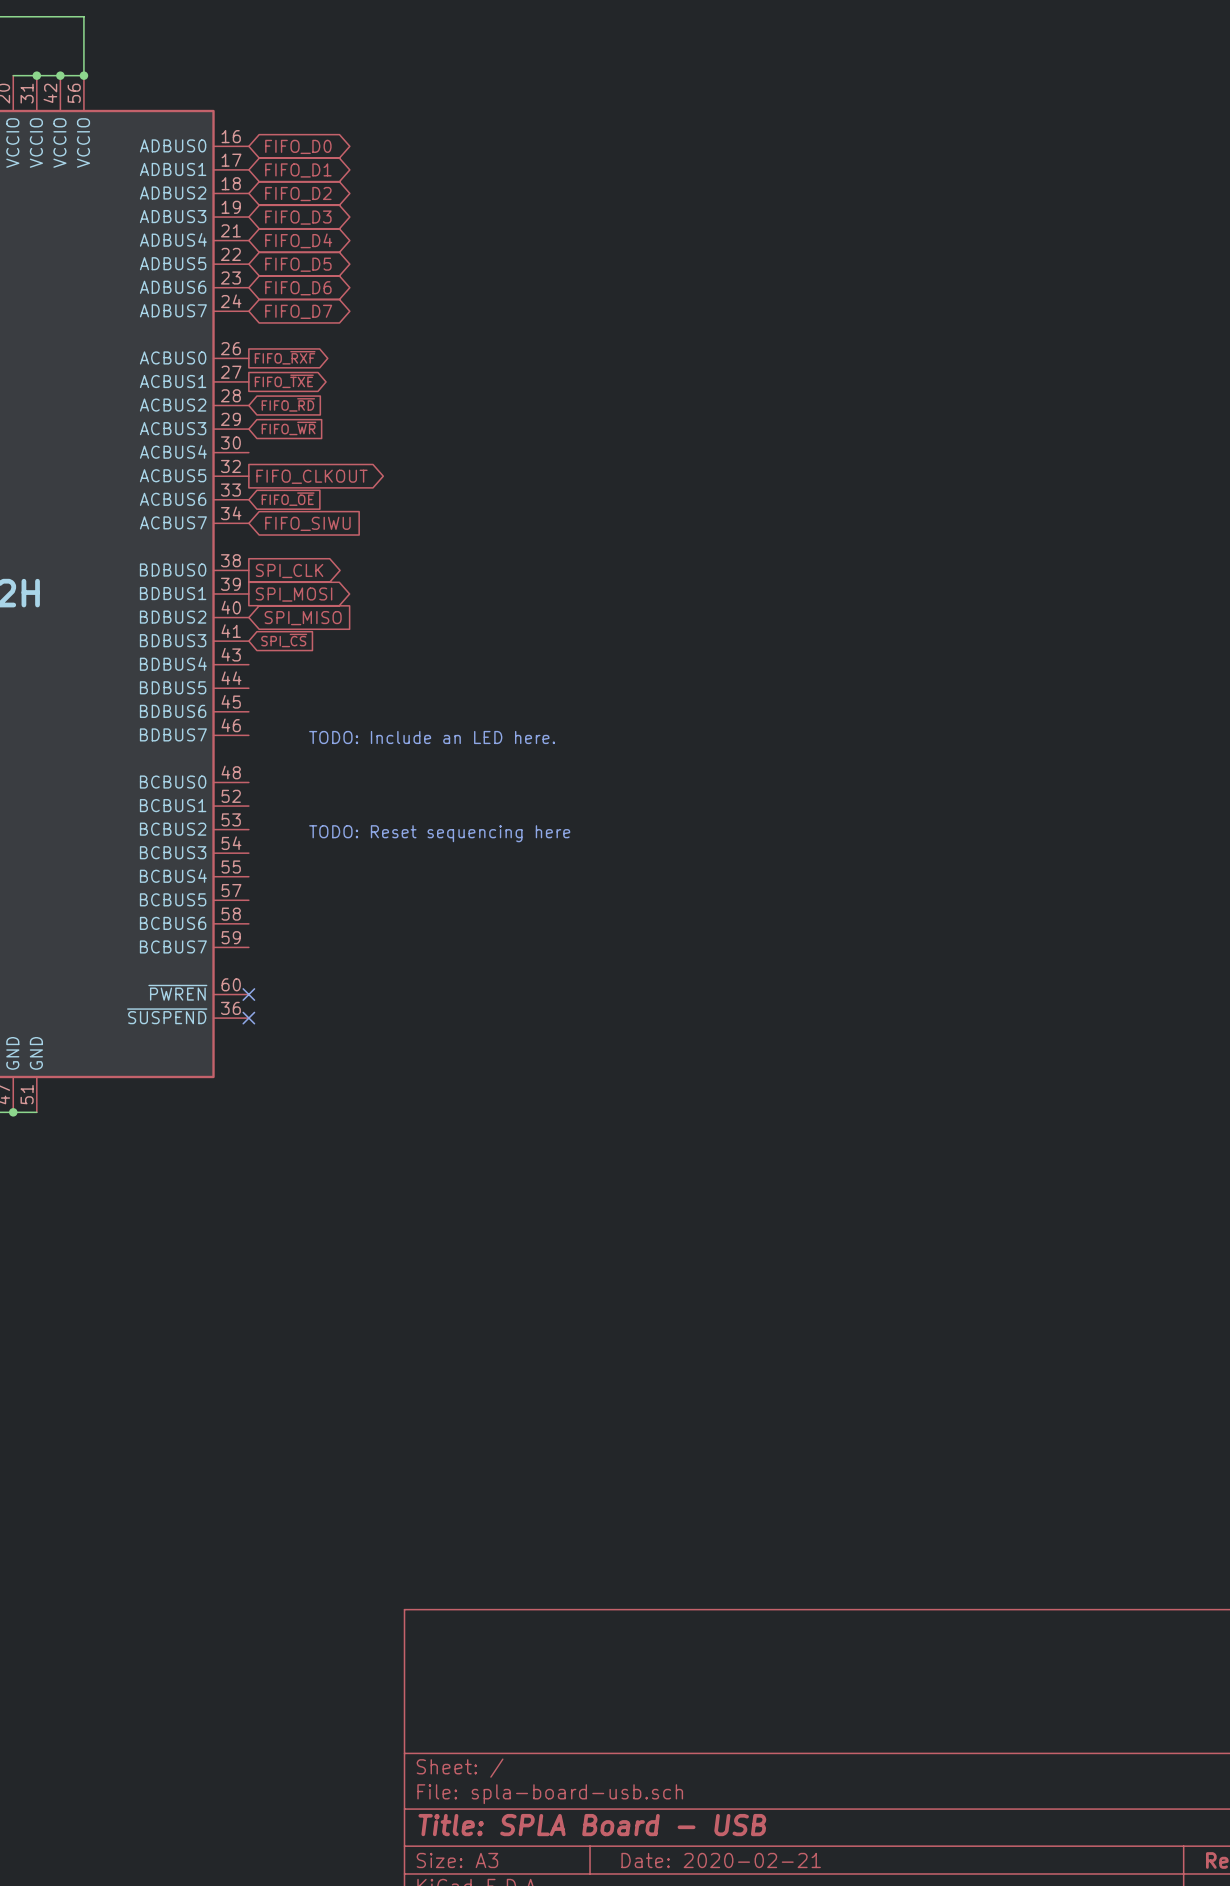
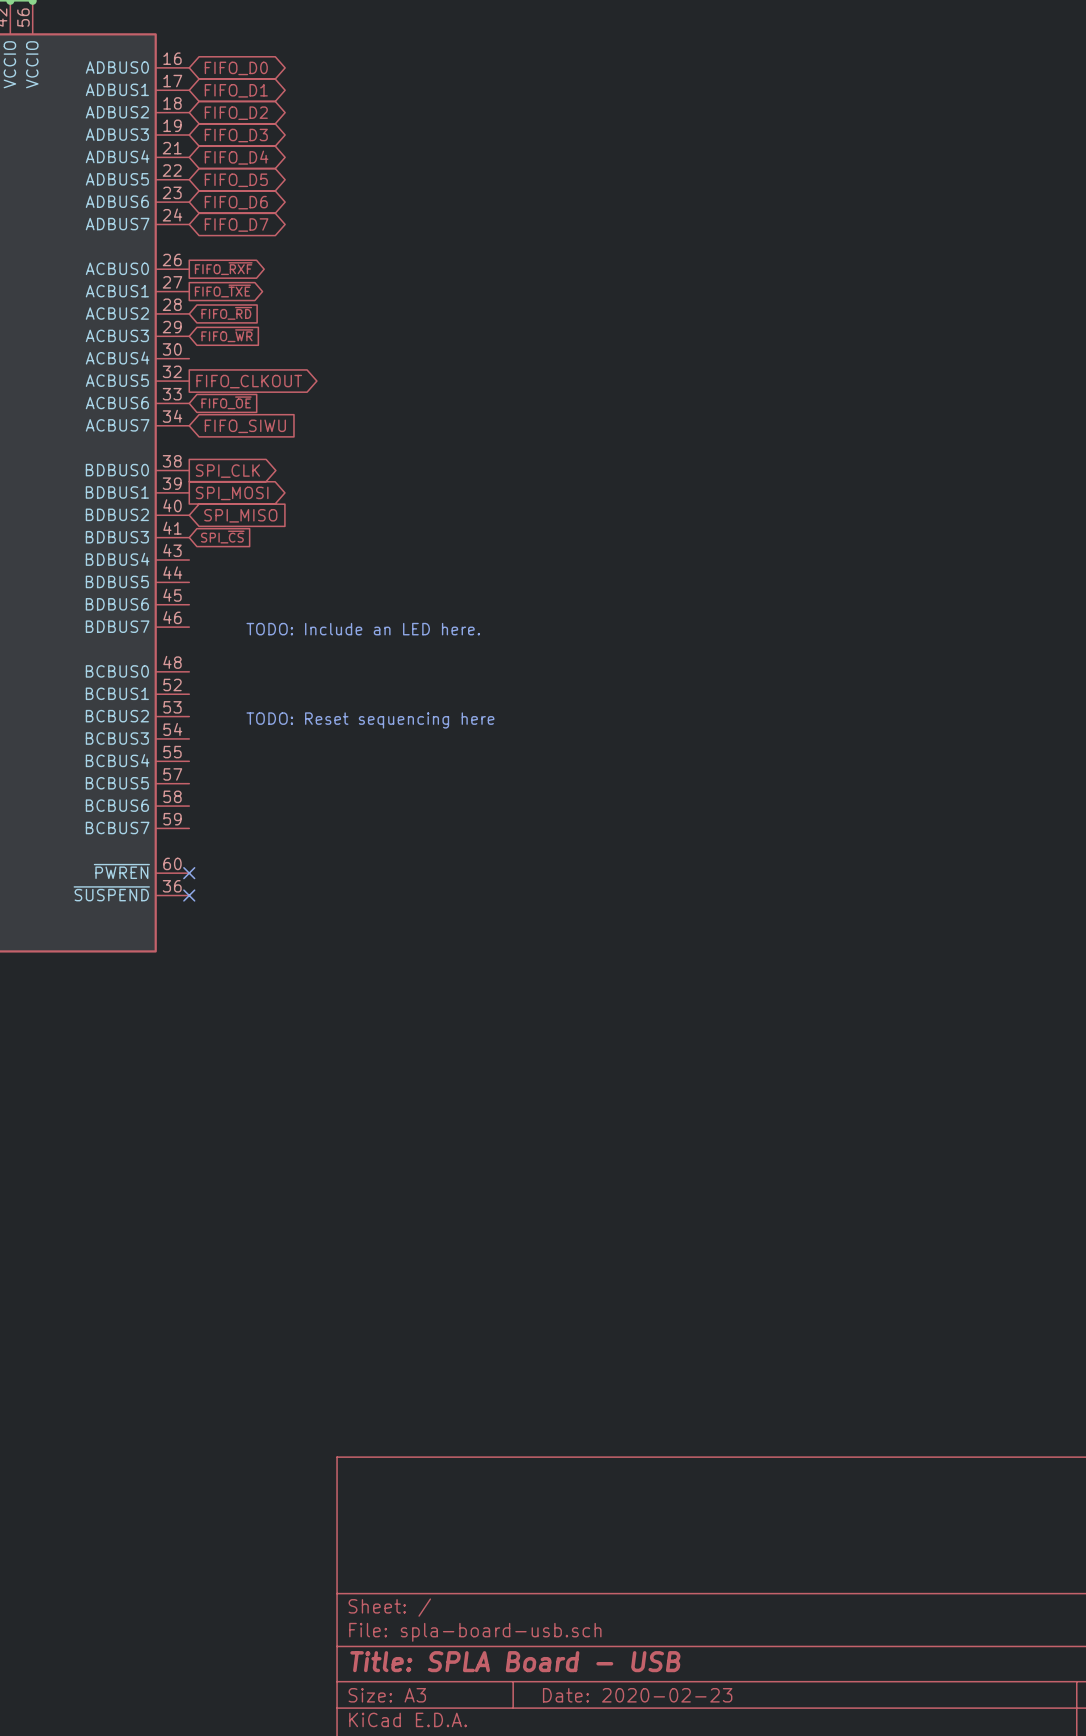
title block: Date: 2020-02-21 (721, 1860) -> Date: 2020-02-23 (637, 1695)

